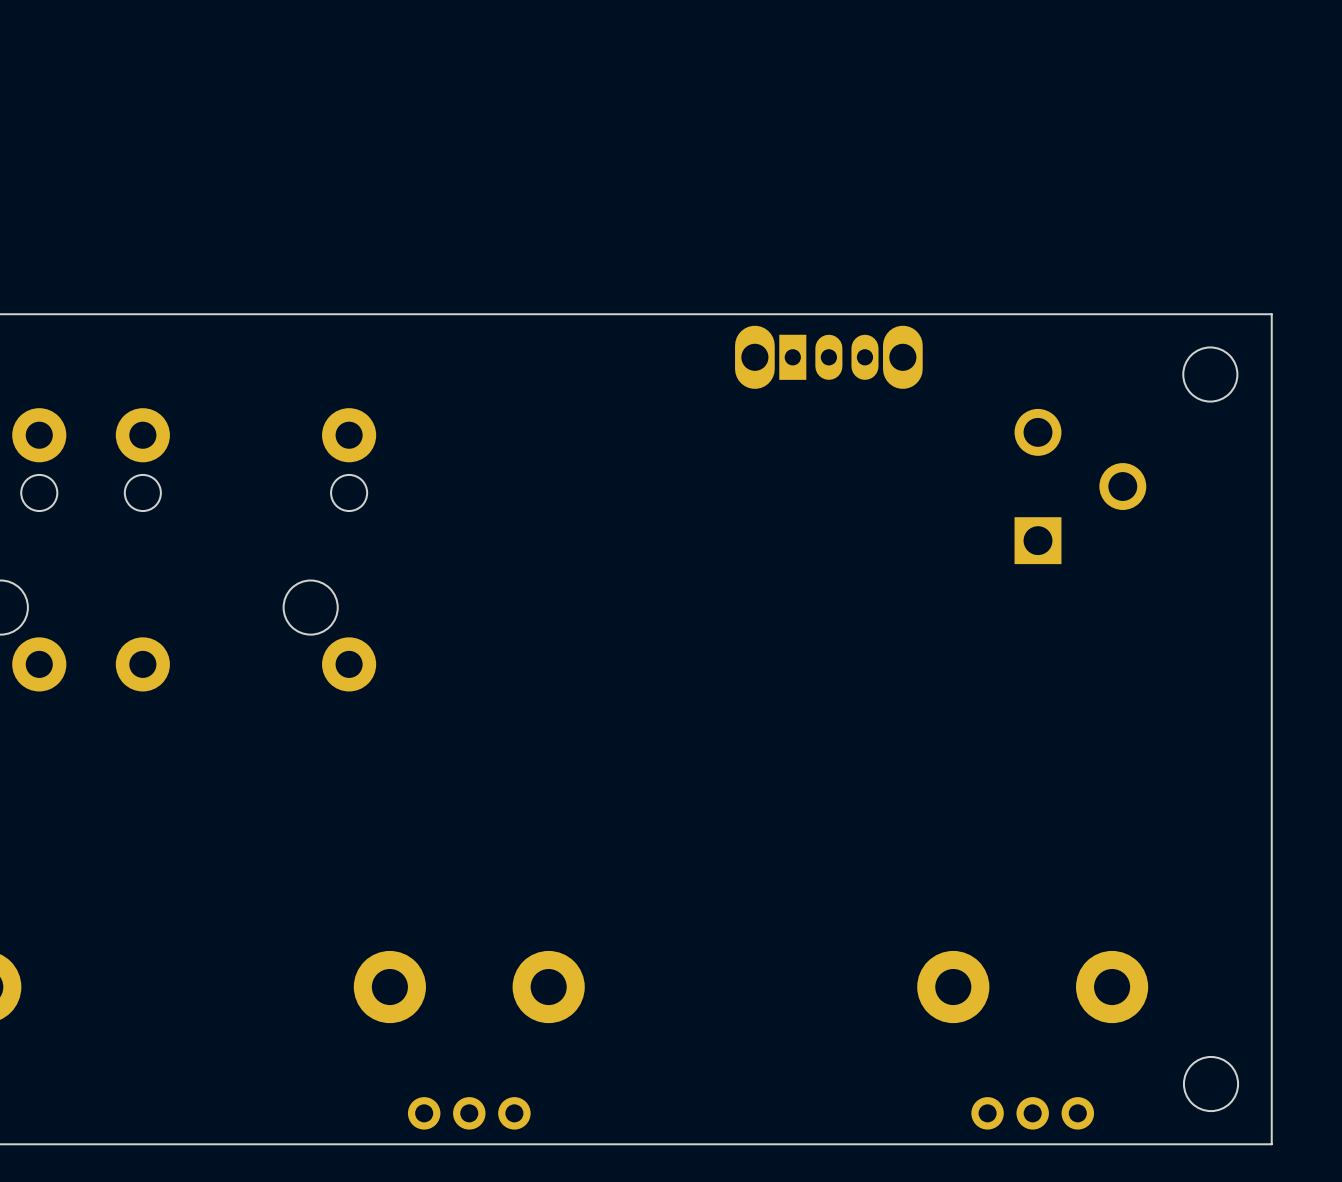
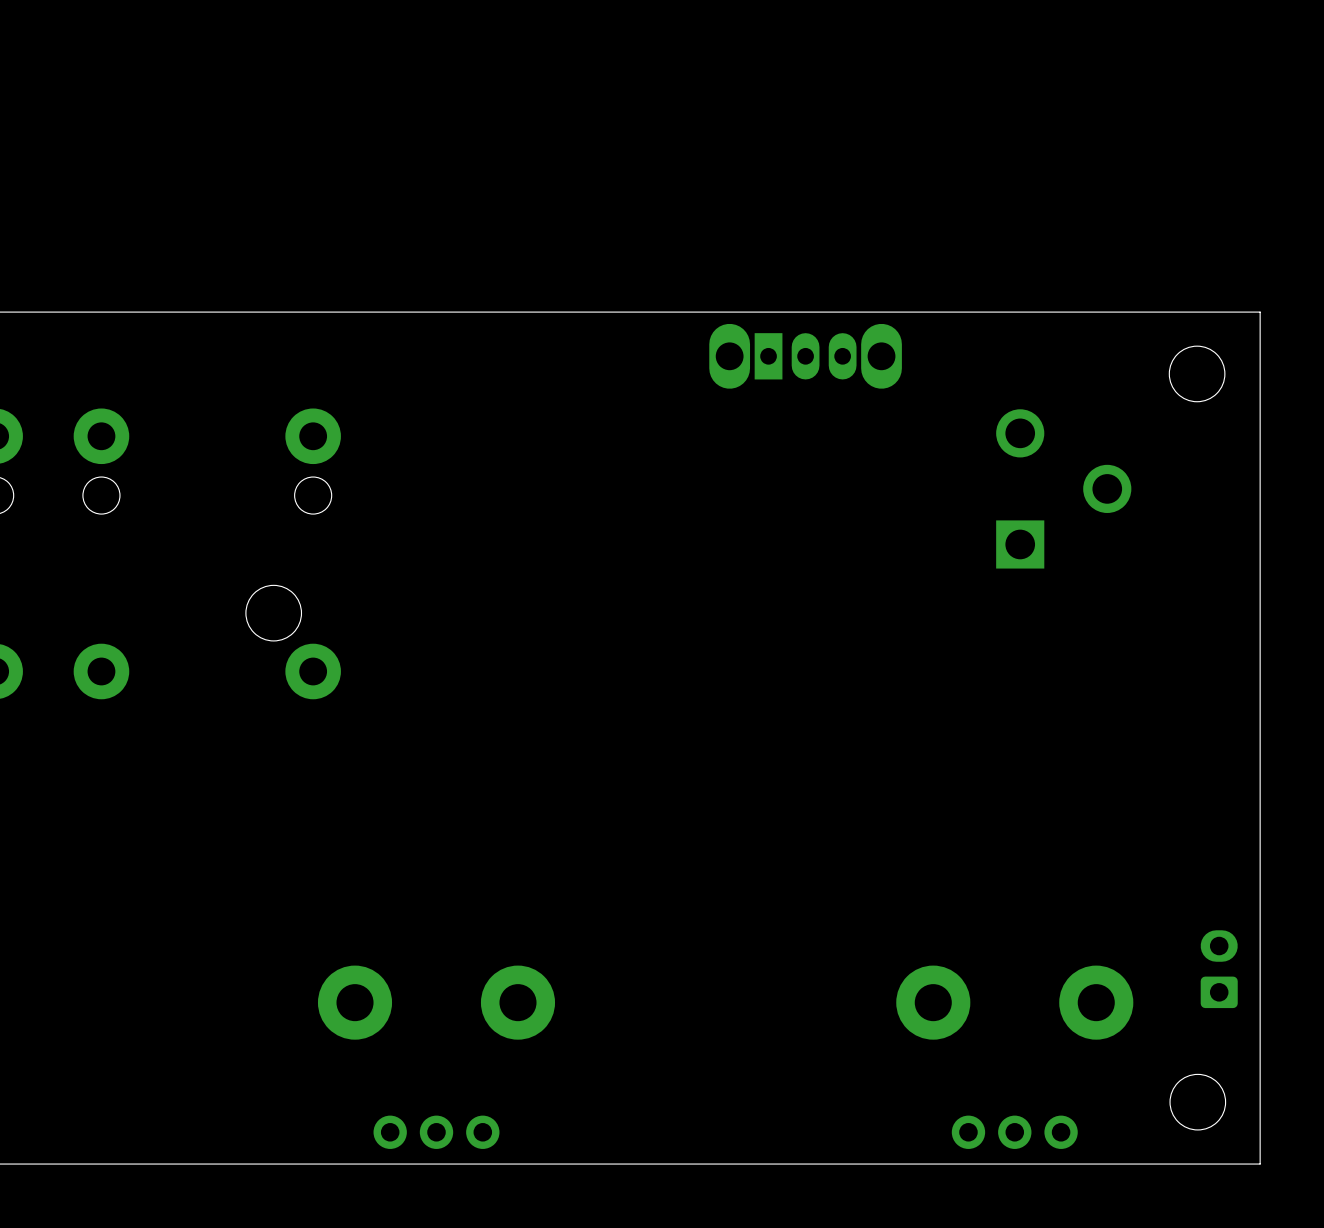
part: none -> (1219, 969)

